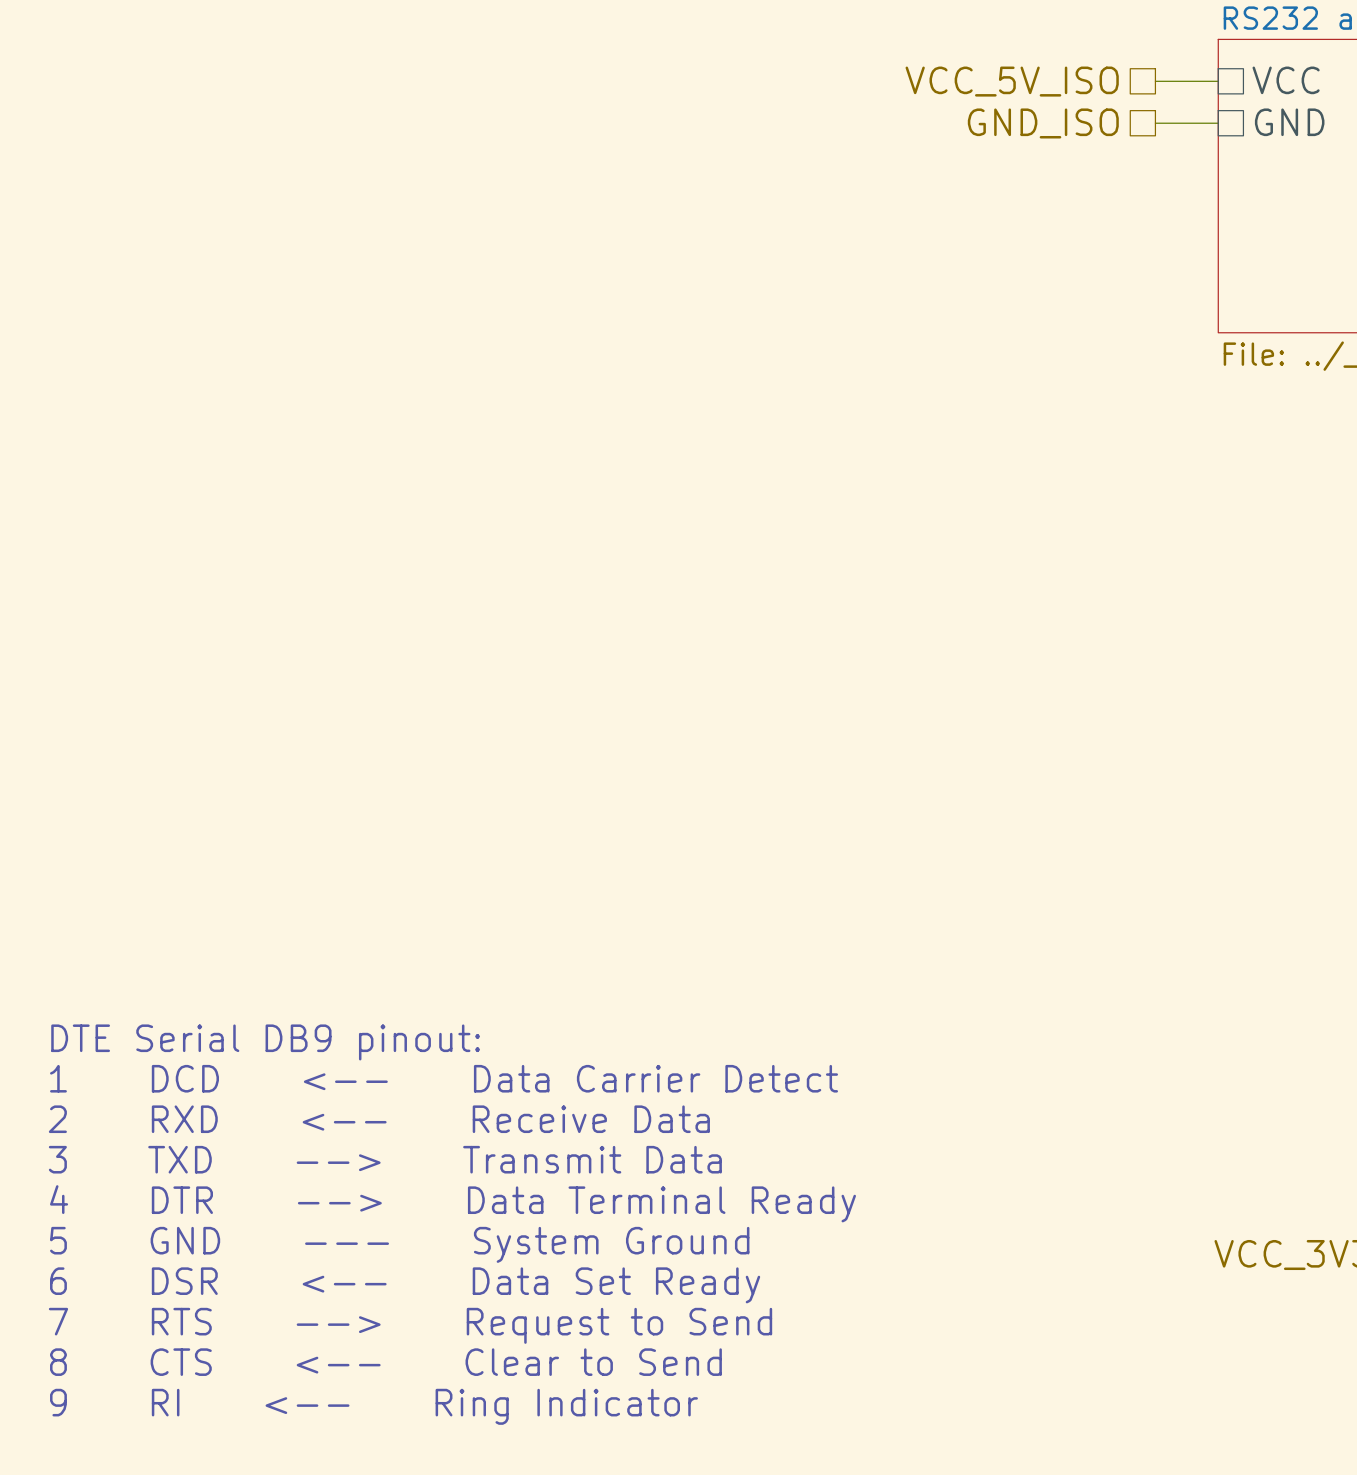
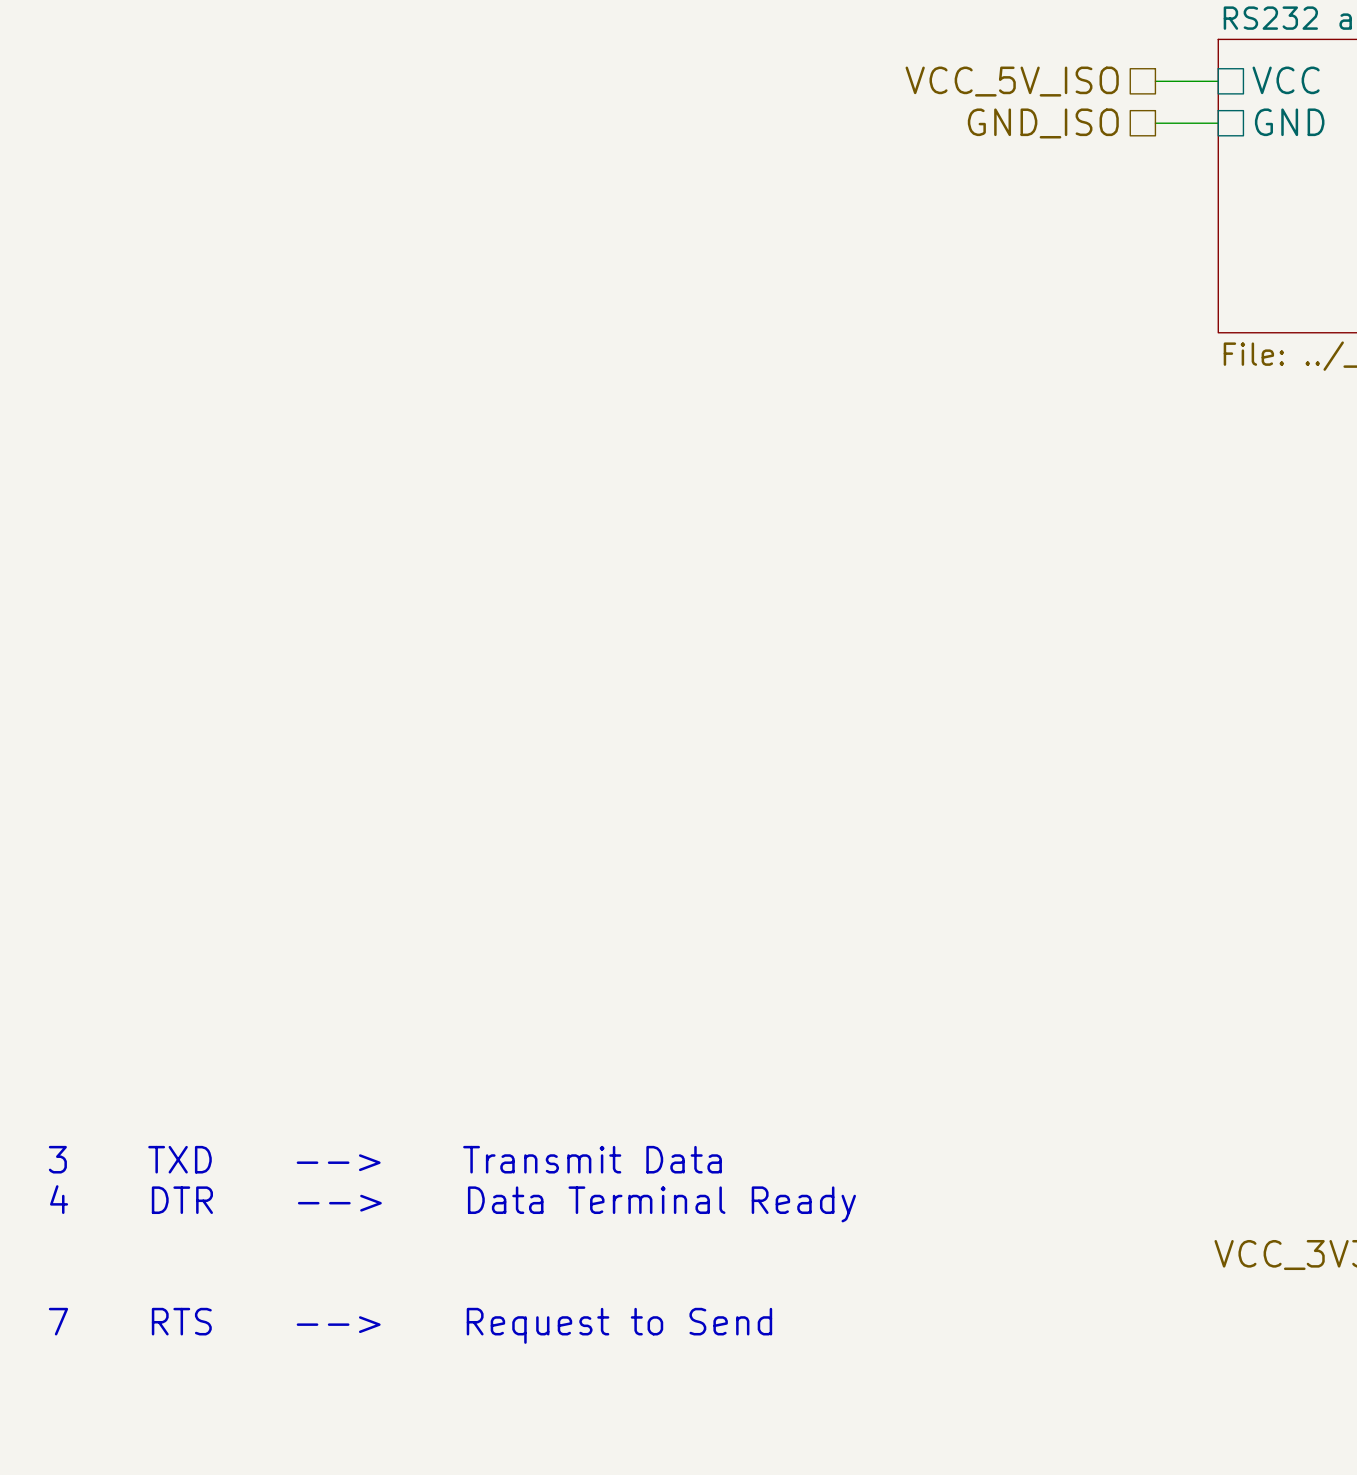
text: DTE Serial DB9 pinout: (265, 1042) -> none
text: 1 DCD <-- Data Carrier Detect (444, 1078) -> none
text: 2 RXD <-- Receive Data (379, 1119) -> none
text: 5 GND --- System Ground (399, 1244) -> none
text: 6 DSR <-- Data Set Ready (405, 1285) -> none
text: 8 CTS <-- Clear to Send (385, 1362) -> none
text: 9 RI <-- Ring Indicator (373, 1406) -> none

